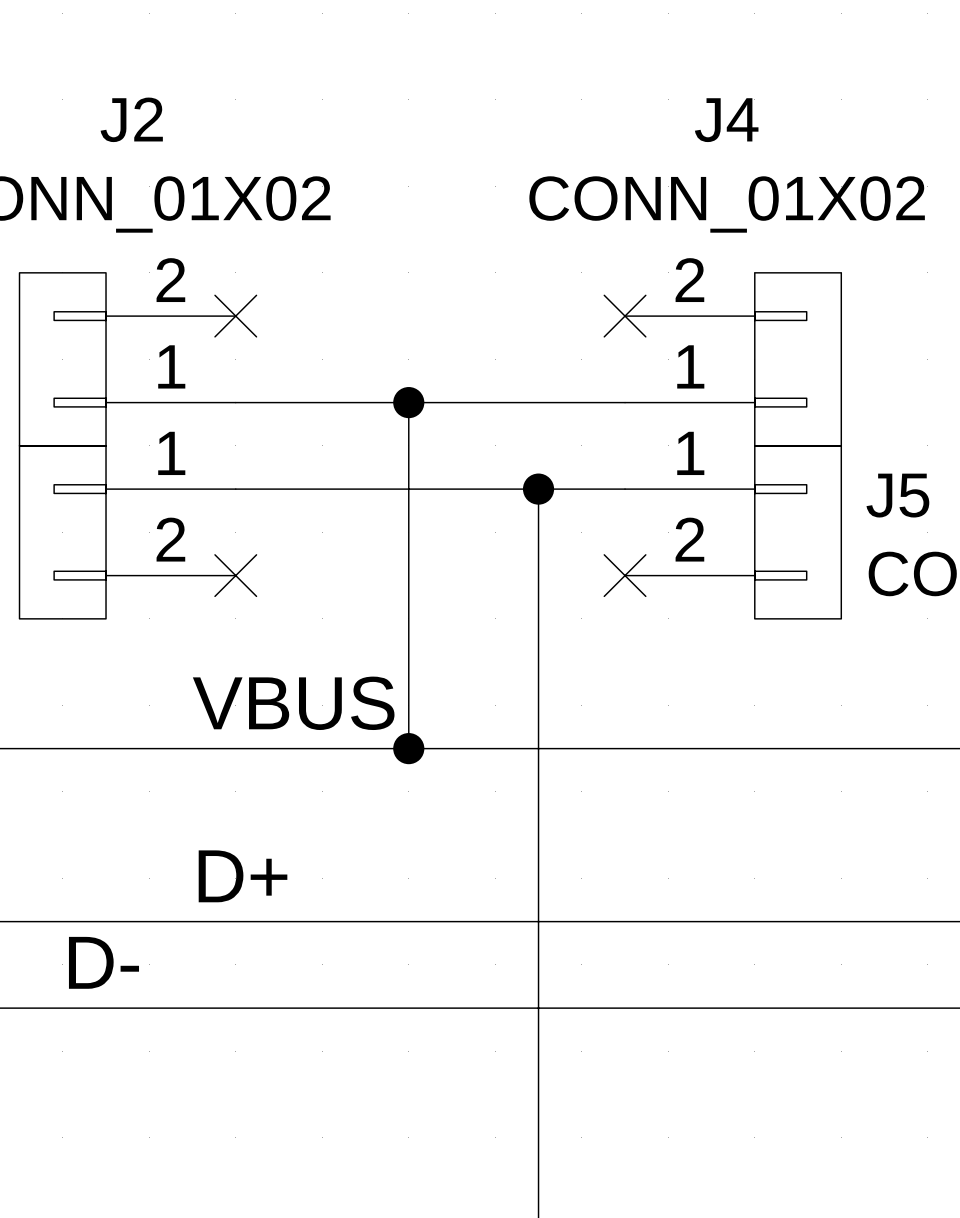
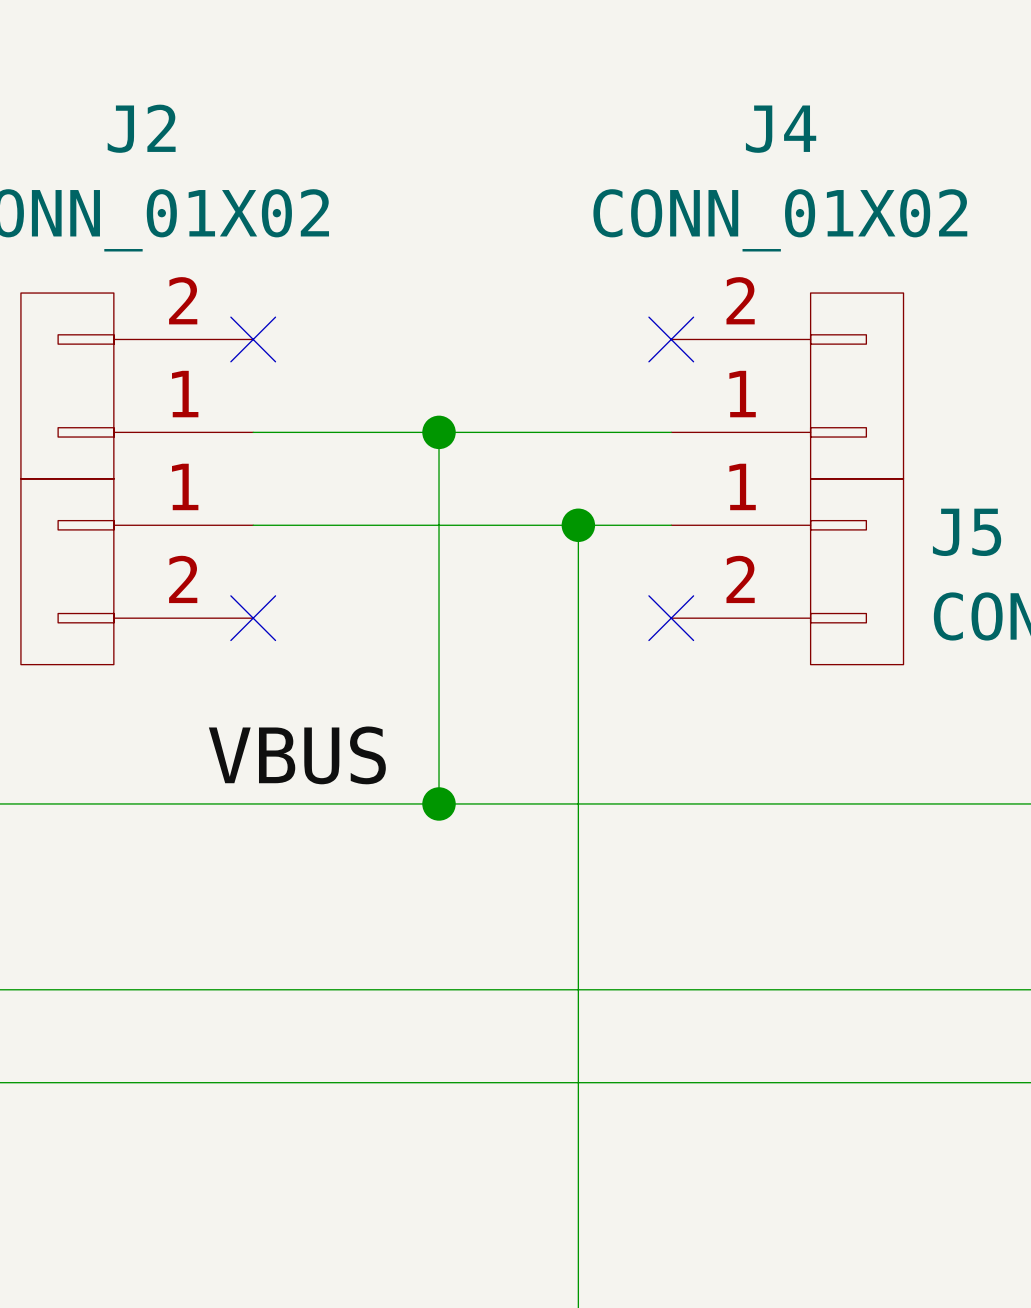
label: D+ (243, 876) -> none
label: D- (103, 962) -> none

